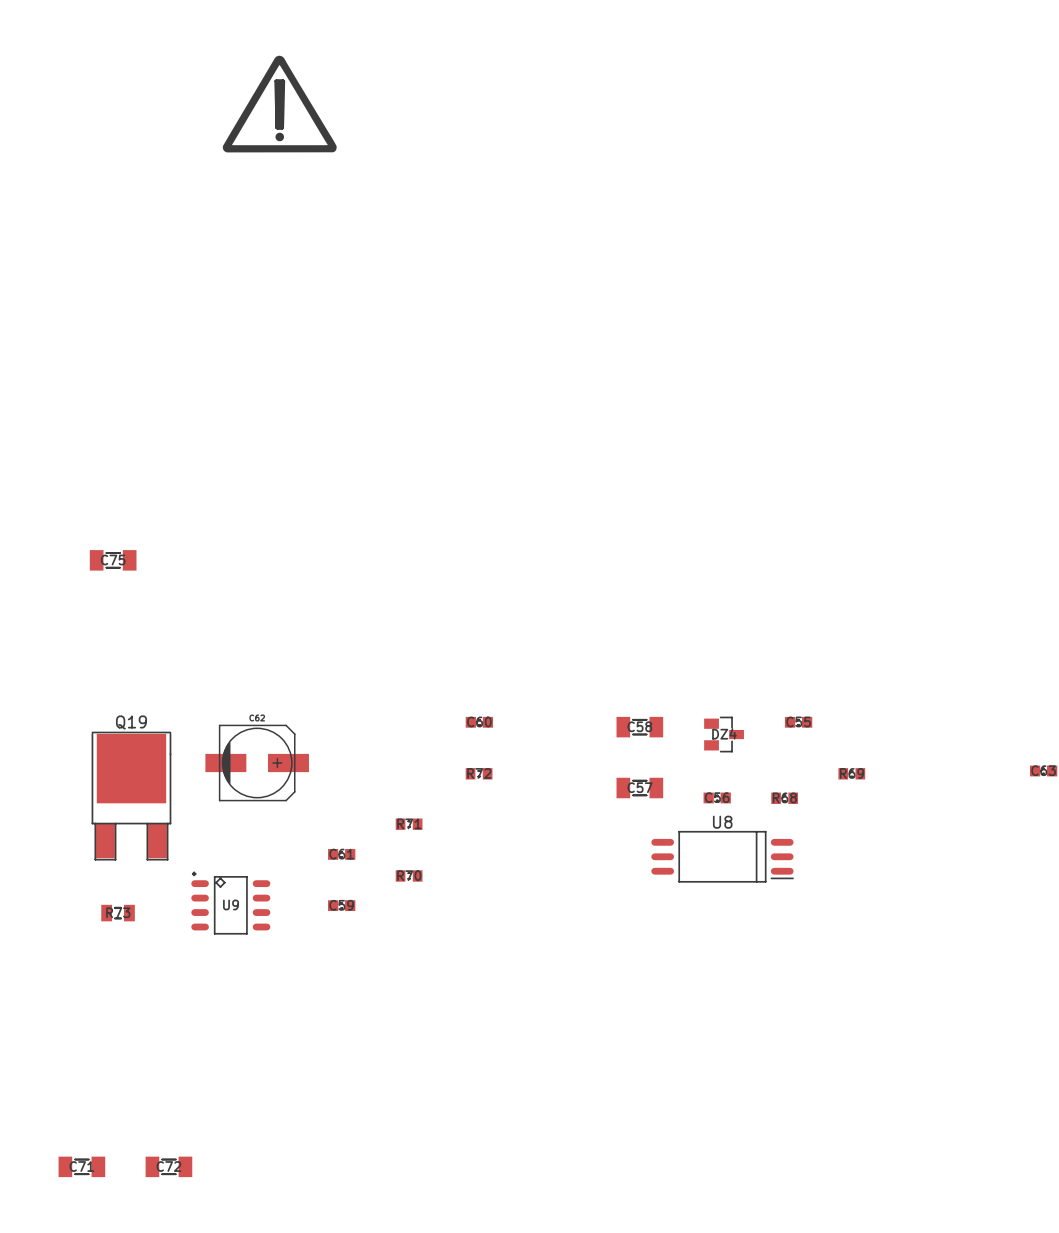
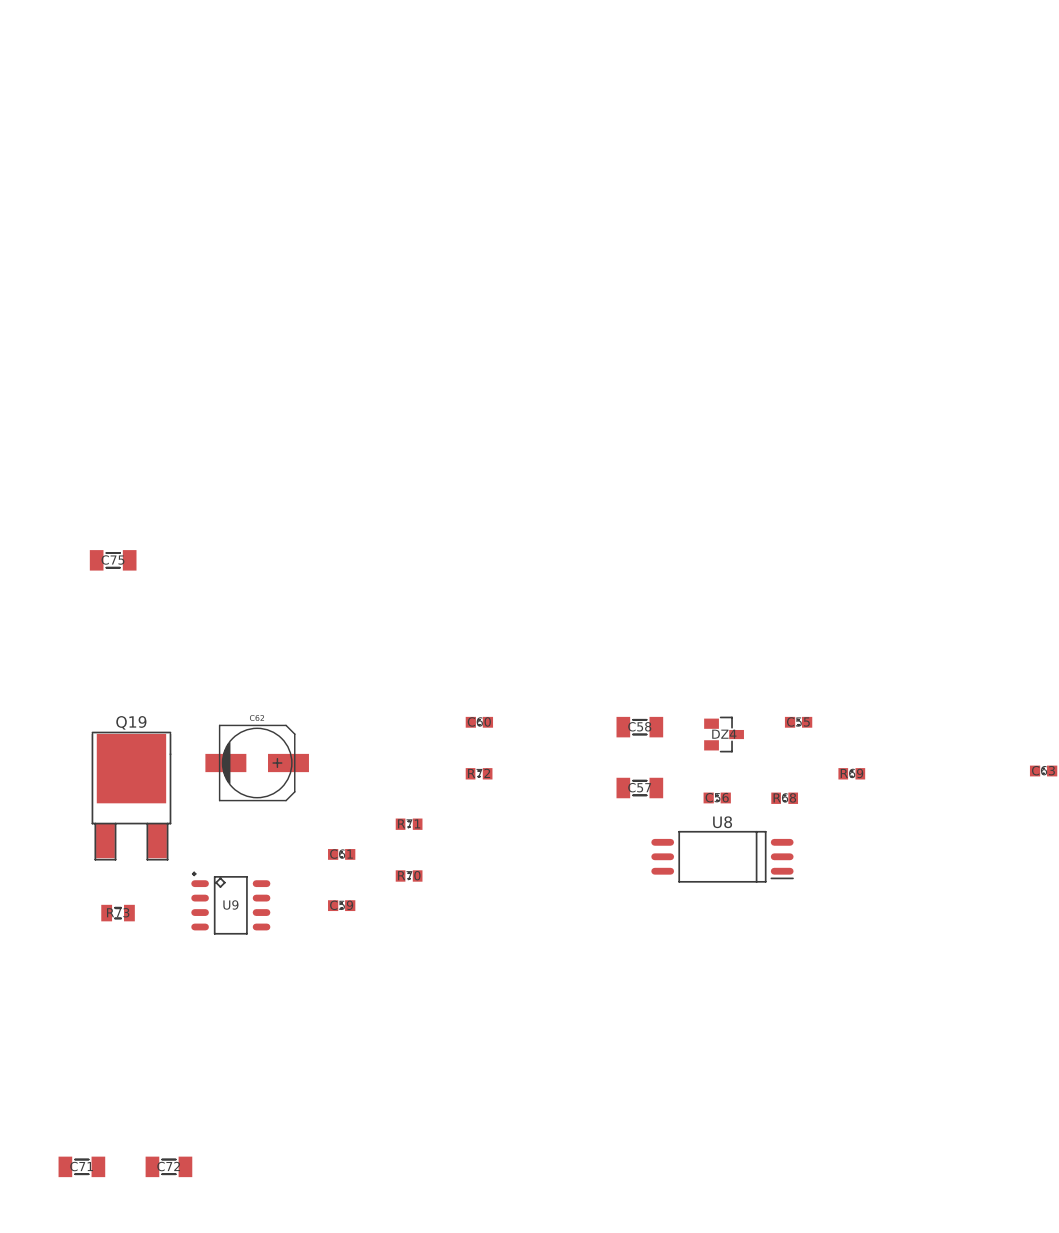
drawing: [222, 55, 337, 153] -> none

